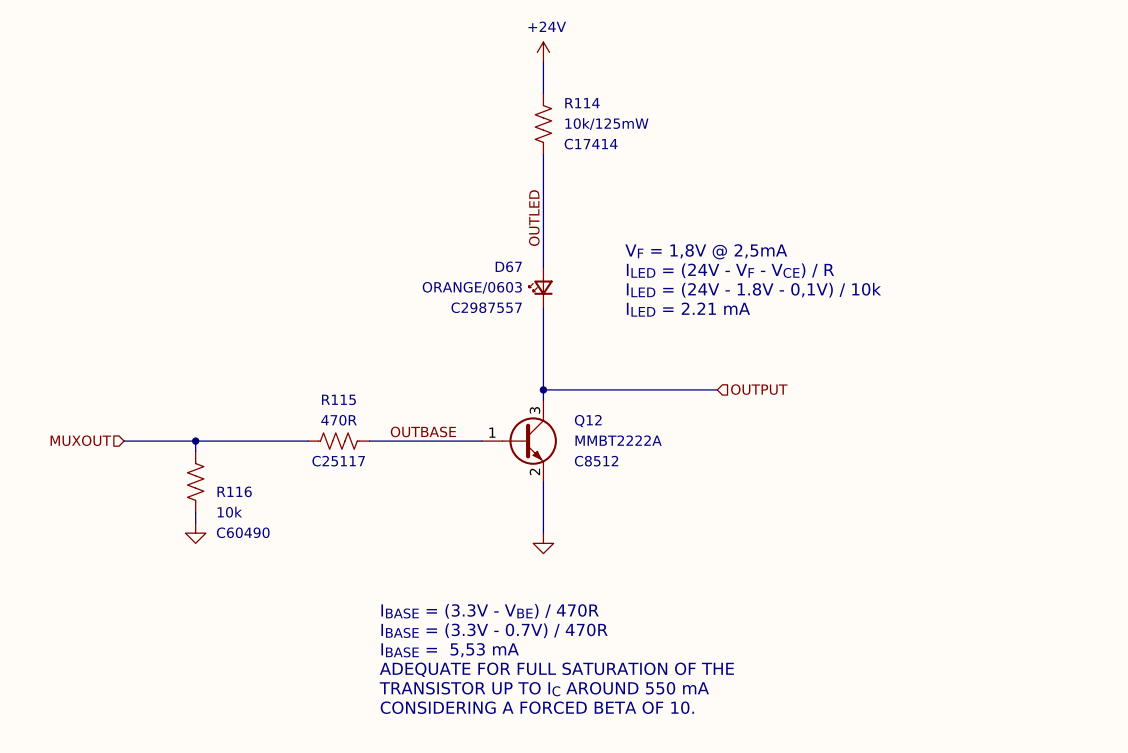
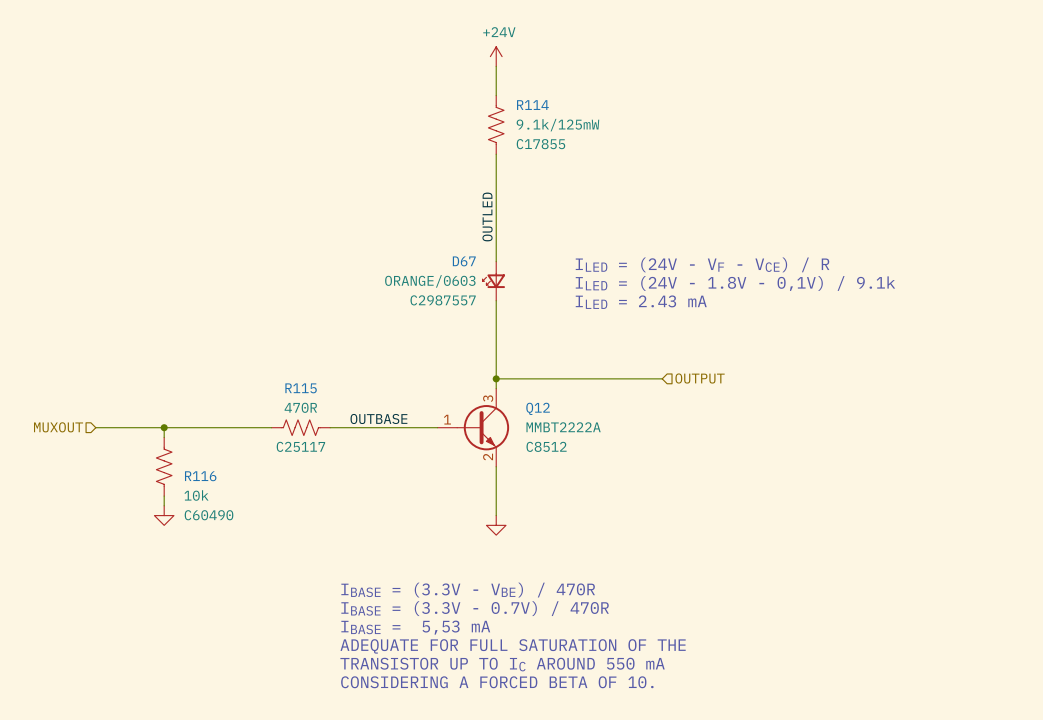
R114 value: 10k/125mW (606, 124) -> 9.1k/125mW (557, 125)
R114 text: C17414 (591, 144) -> C17855 (540, 144)
text: VF = 1,8V @ 2,5mA (706, 251) -> none
text: ILED = (24V - 1.8V - 0,1V) / 10k (753, 290) -> ILED = (24V - 1.8V - 0,1V) / 9.1k (735, 283)
text: ILED = 2.21 mA (688, 309) -> ILED = 2.43 mA (641, 302)

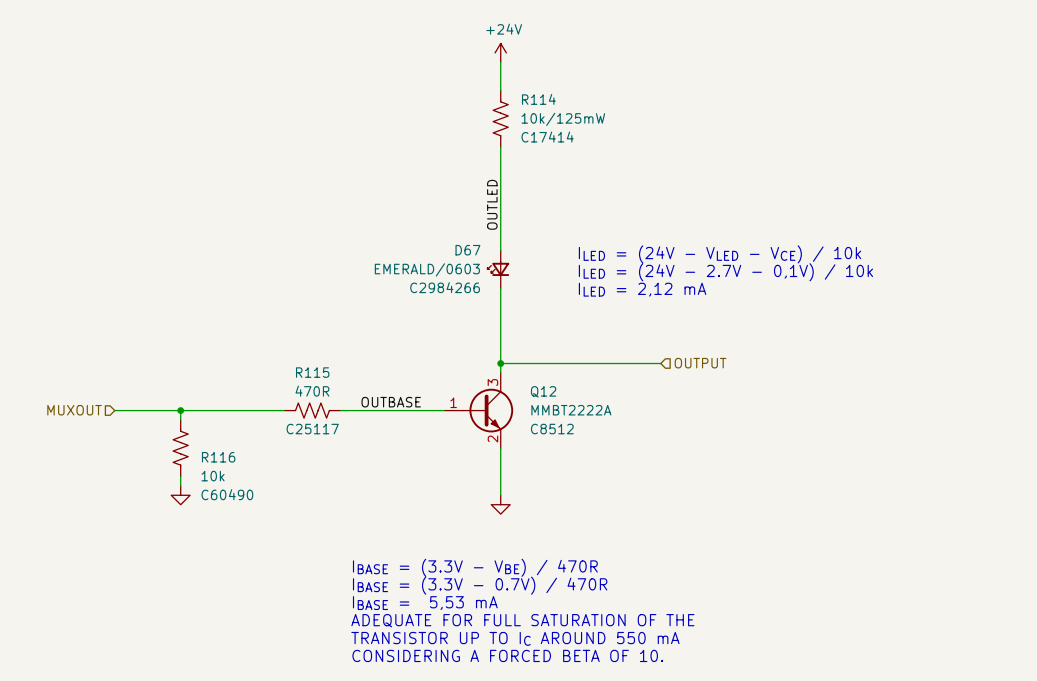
R114 value: 9.1k/125mW (557, 125) -> 10k/125mW (563, 119)
R114 text: C17855 (540, 144) -> C17414 (547, 137)
text: ILED = (24V - VF - VCE) / R (702, 264) -> ILED = (24V - VLED - VCE) / 10k (720, 254)
D67 value: ORANGE/0603 (430, 281) -> EMERALD/0603 (427, 269)
text: ILED = (24V - 1.8V - 0,1V) / 9.1k (735, 283) -> ILED = (24V - 2.7V - 0,1V) / 10k (725, 272)
D67 text: C2987557 (443, 300) -> C2984266 (445, 287)
text: ILED = 2.43 mA (641, 302) -> ILED = 2,12 mA (642, 289)

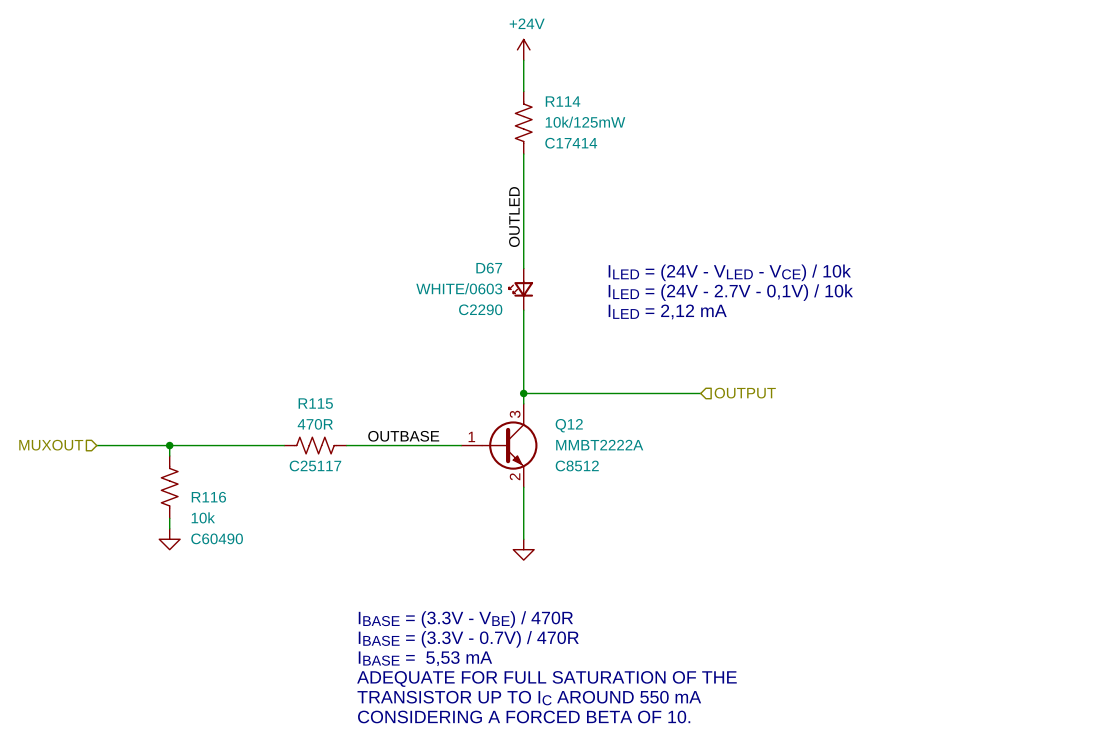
D67 value: EMERALD/0603 (427, 269) -> WHITE/0603 (459, 288)
D67 text: C2984266 (445, 287) -> C2290 (480, 309)

